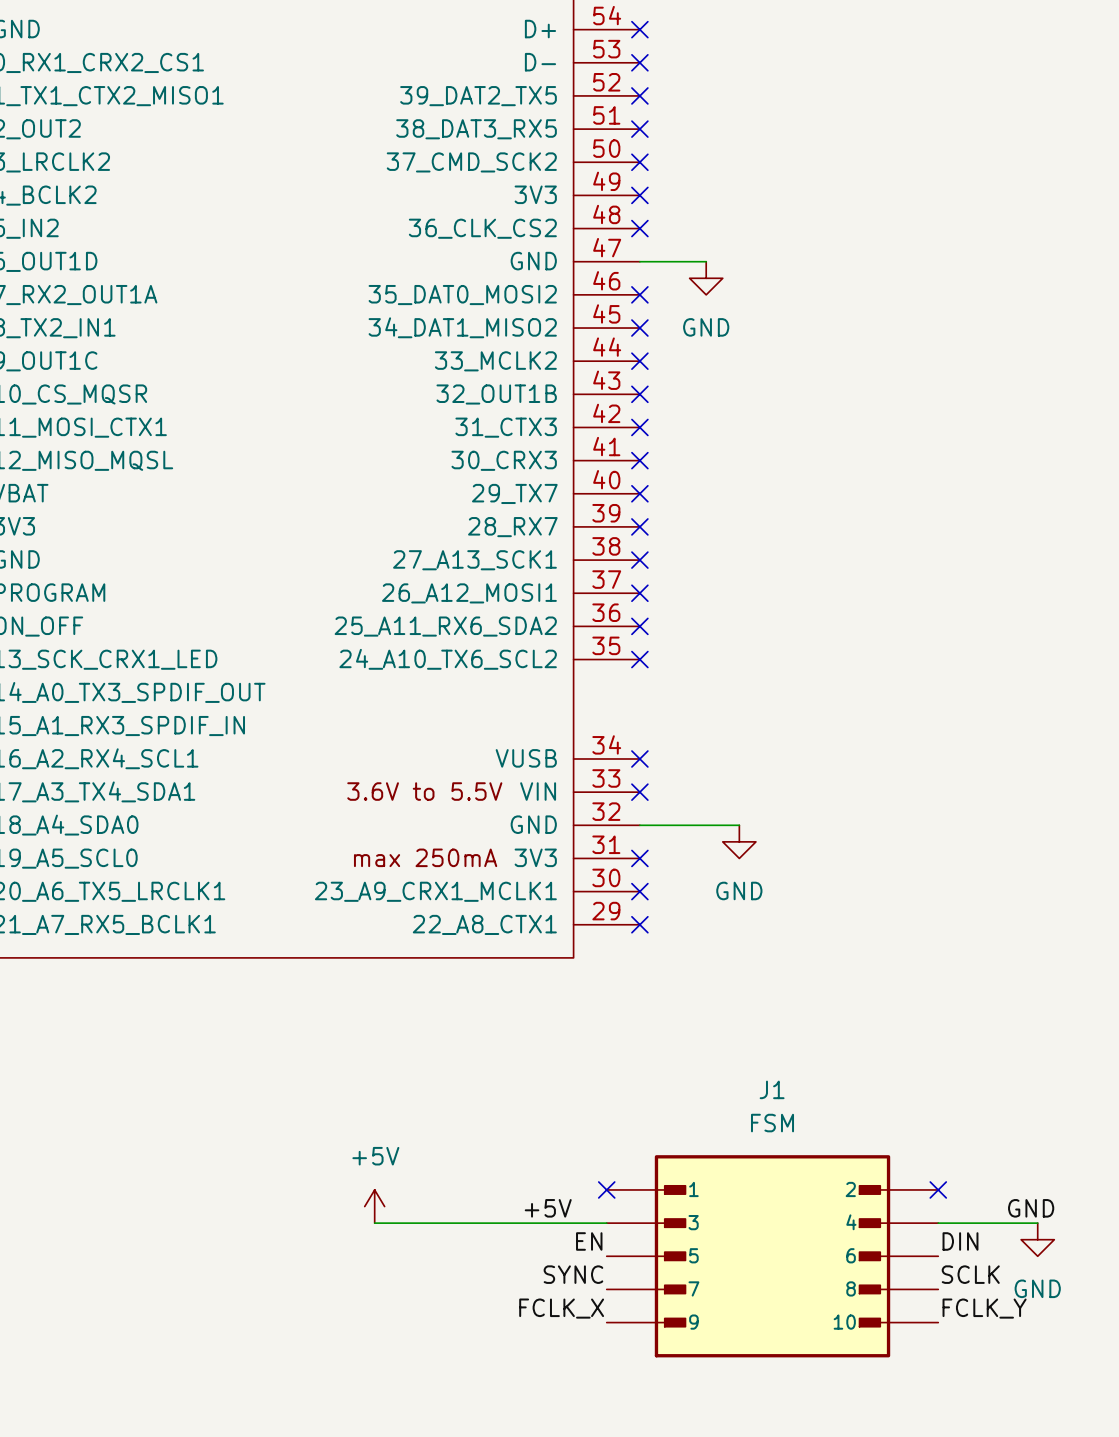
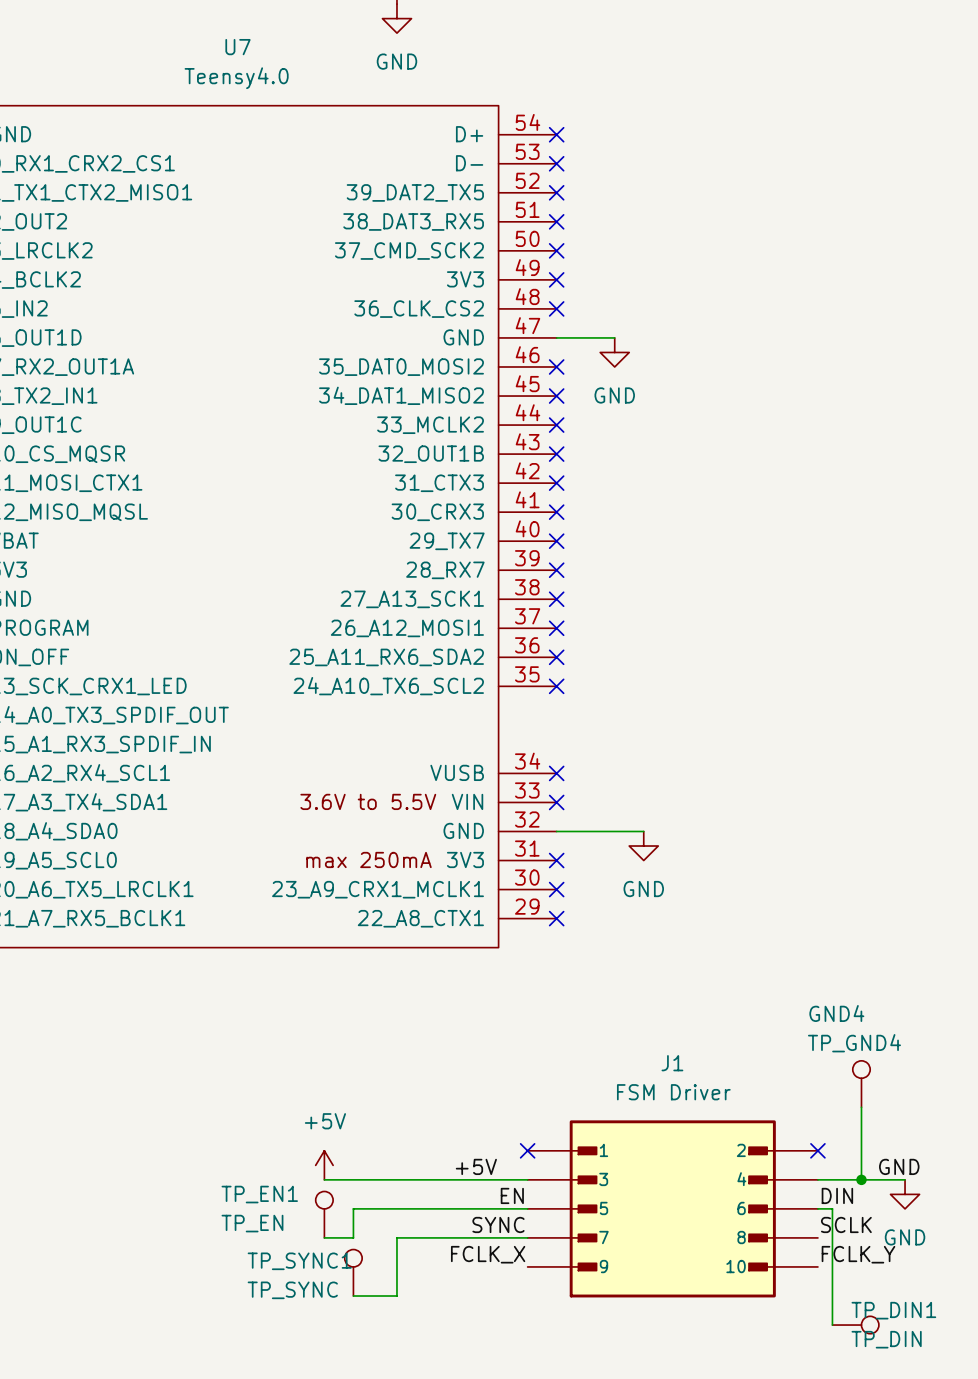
GND4: none -> TP_GND4 (861, 1084)
J1 value: FSM (772, 1123) -> FSM Driver (673, 1092)
wire: none -> (861, 1107) (861, 1179)
junction: none -> (861, 1179)
wire: none -> (527, 1208) (353, 1208) (353, 1237) (324, 1237)
wire: none -> (817, 1208) (832, 1208) (832, 1325)
TP_EN1: none -> TP_EN (324, 1214)
wire: none -> (527, 1237) (396, 1237) (396, 1296) (353, 1296)
TP_SYNC1: none -> TP_SYNC (353, 1272)
TP_DIN1: none -> TP_DIN (855, 1325)

